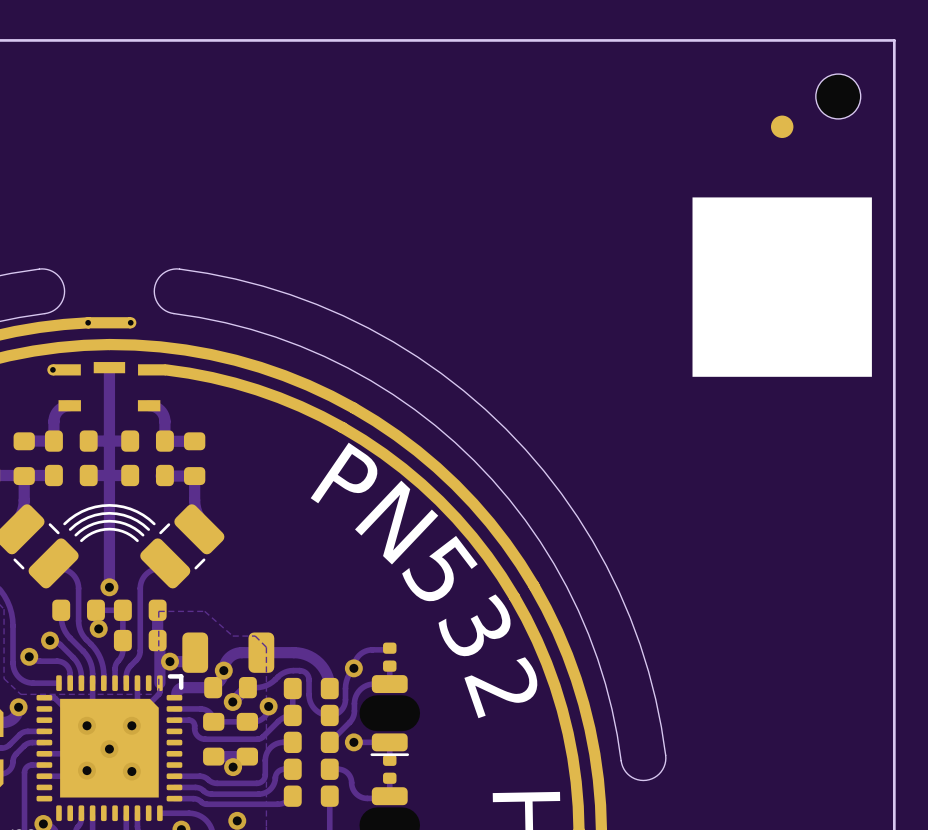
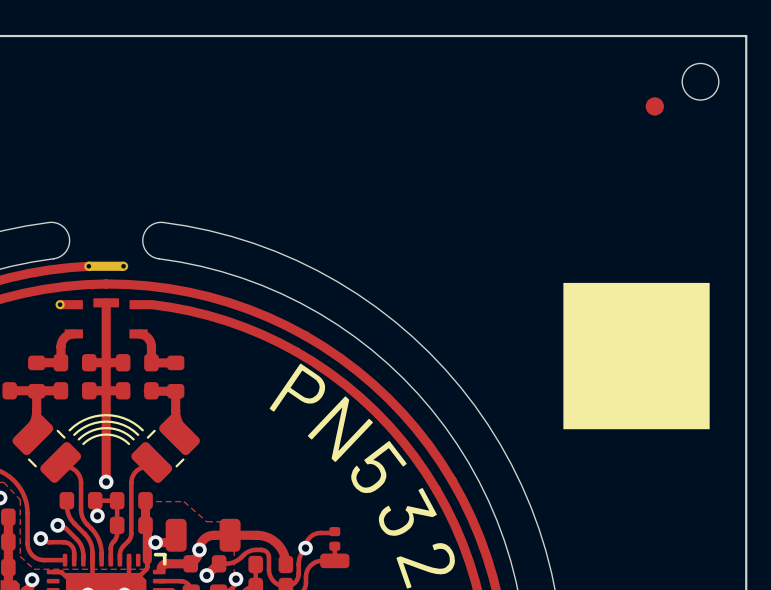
drawing position: (782, 287) -> (636, 356)

